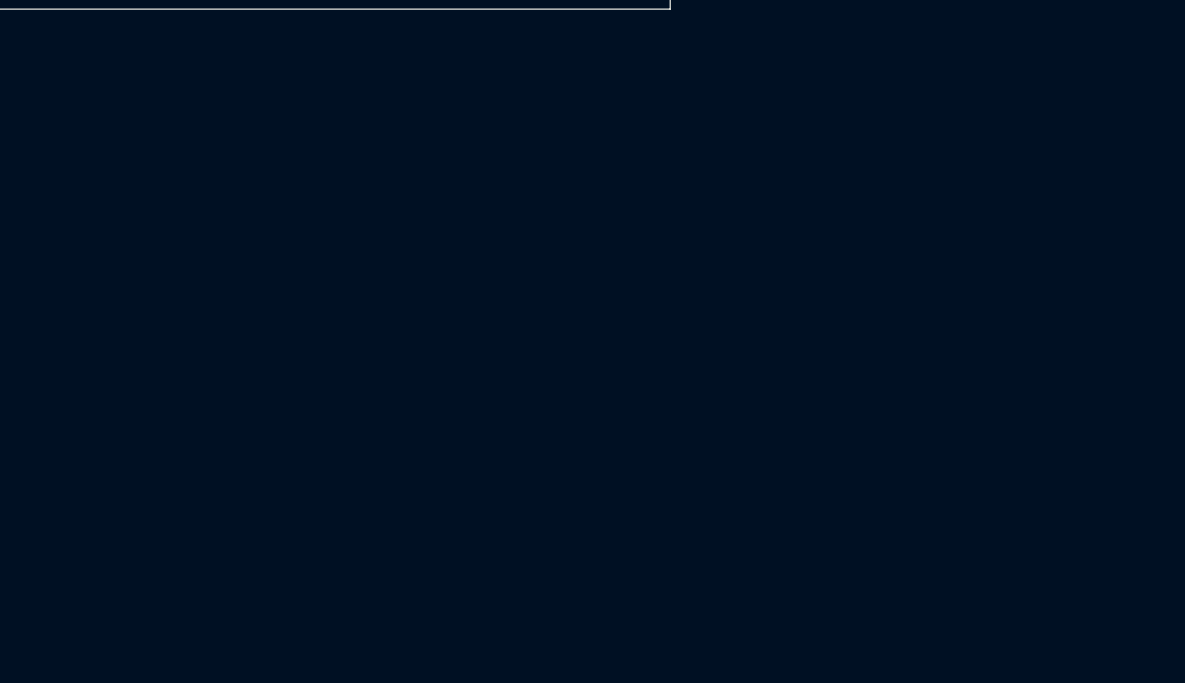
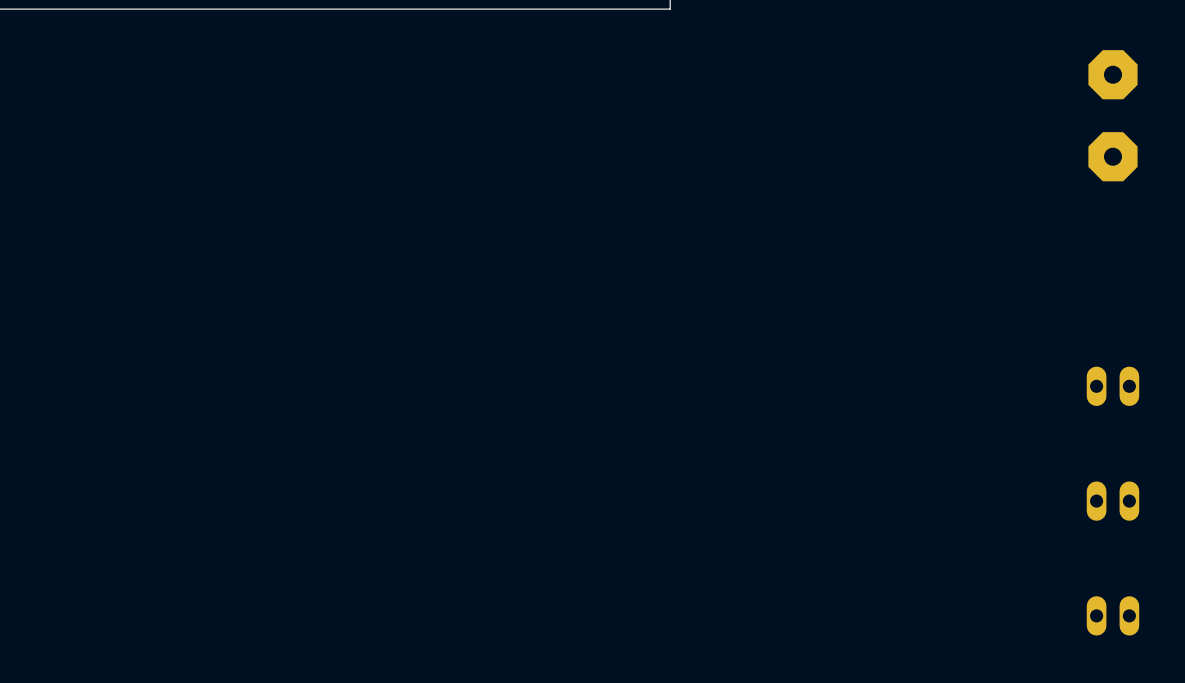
part: none -> (1112, 74)
part: none -> (1112, 156)
part: none -> (1112, 386)
part: none -> (1112, 501)
part: none -> (1112, 615)

